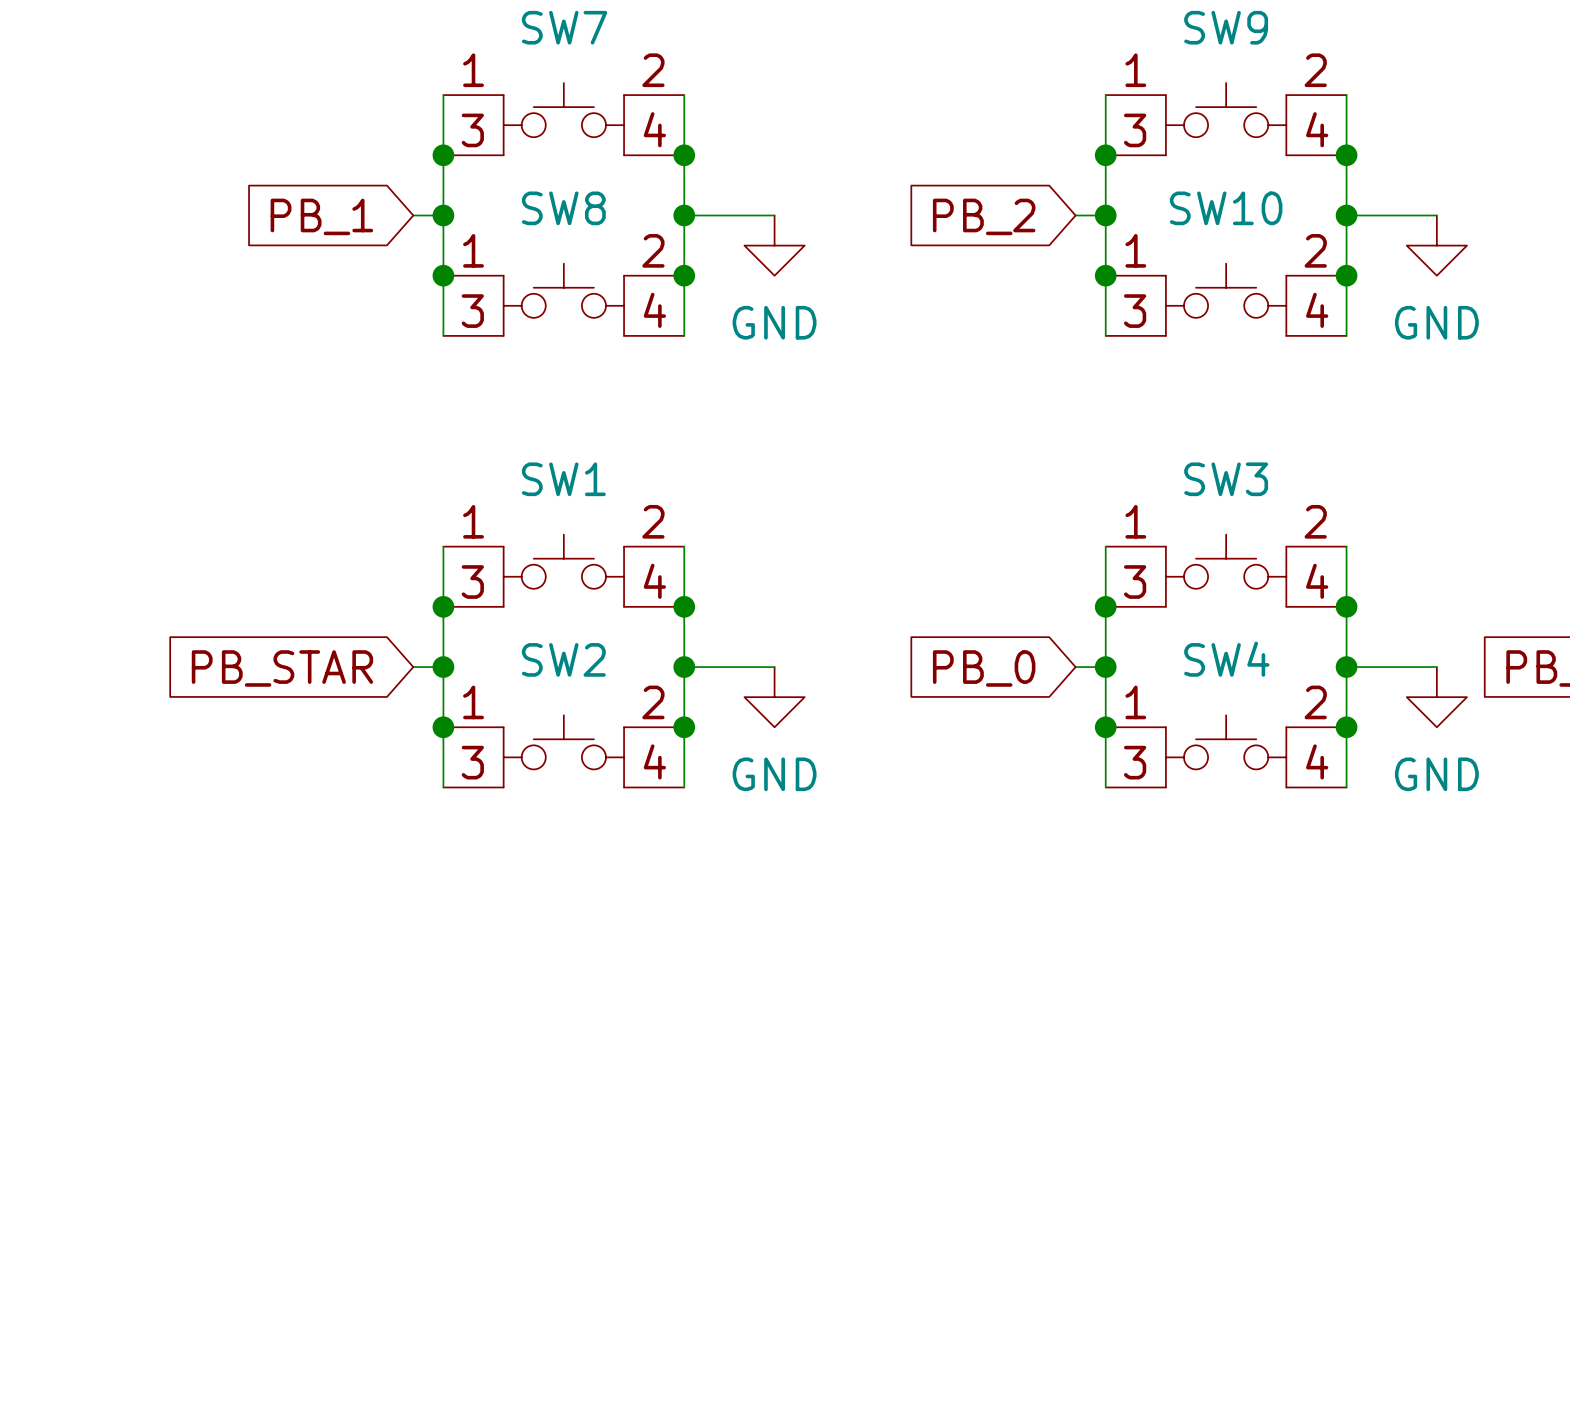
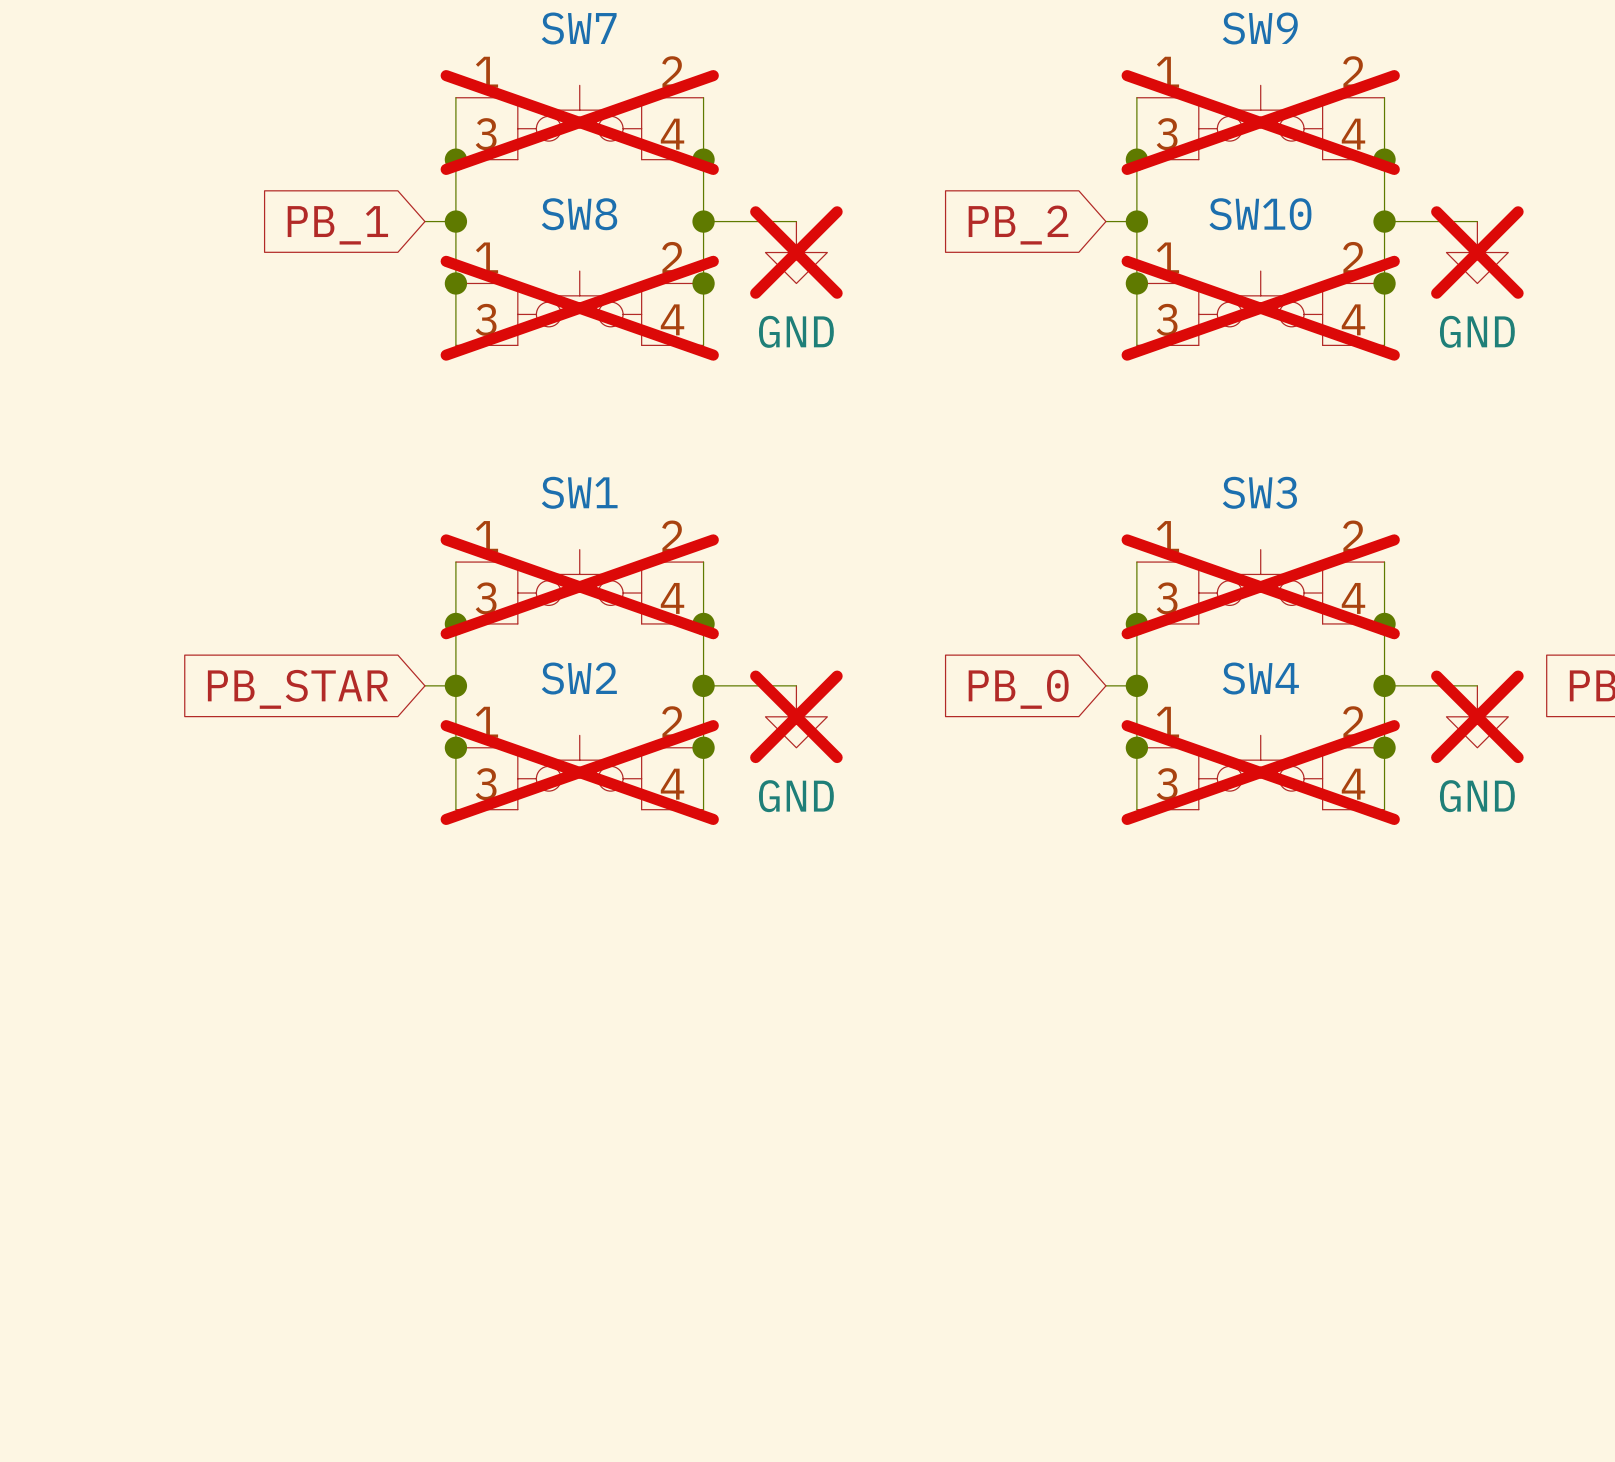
SW7 do-not-place cross: none -> (579, 122)
SW9 do-not-place cross: none -> (1260, 122)
power symbol do-not-place cross: none -> (796, 252)
power symbol do-not-place cross: none -> (1477, 252)
SW8 do-not-place cross: none -> (579, 308)
SW10 do-not-place cross: none -> (1260, 308)
SW1 do-not-place cross: none -> (579, 586)
SW3 do-not-place cross: none -> (1260, 586)
power symbol do-not-place cross: none -> (796, 716)
power symbol do-not-place cross: none -> (1477, 716)
SW2 do-not-place cross: none -> (579, 772)
SW4 do-not-place cross: none -> (1260, 772)

